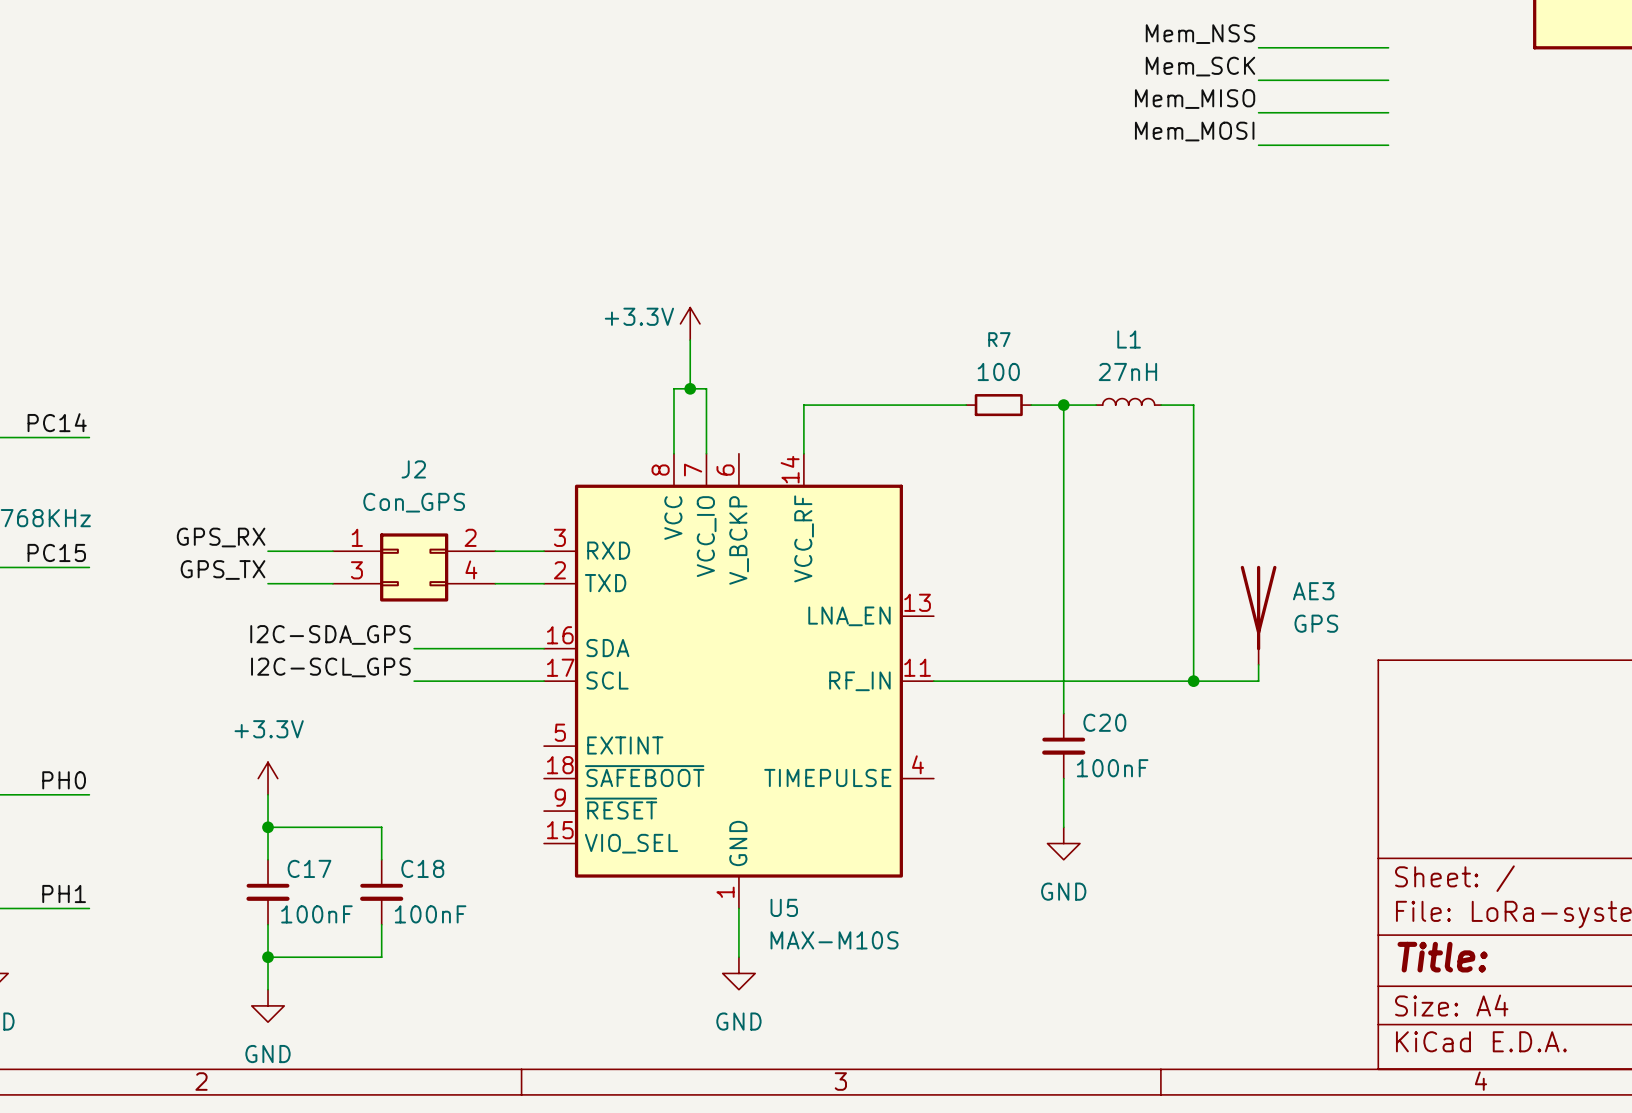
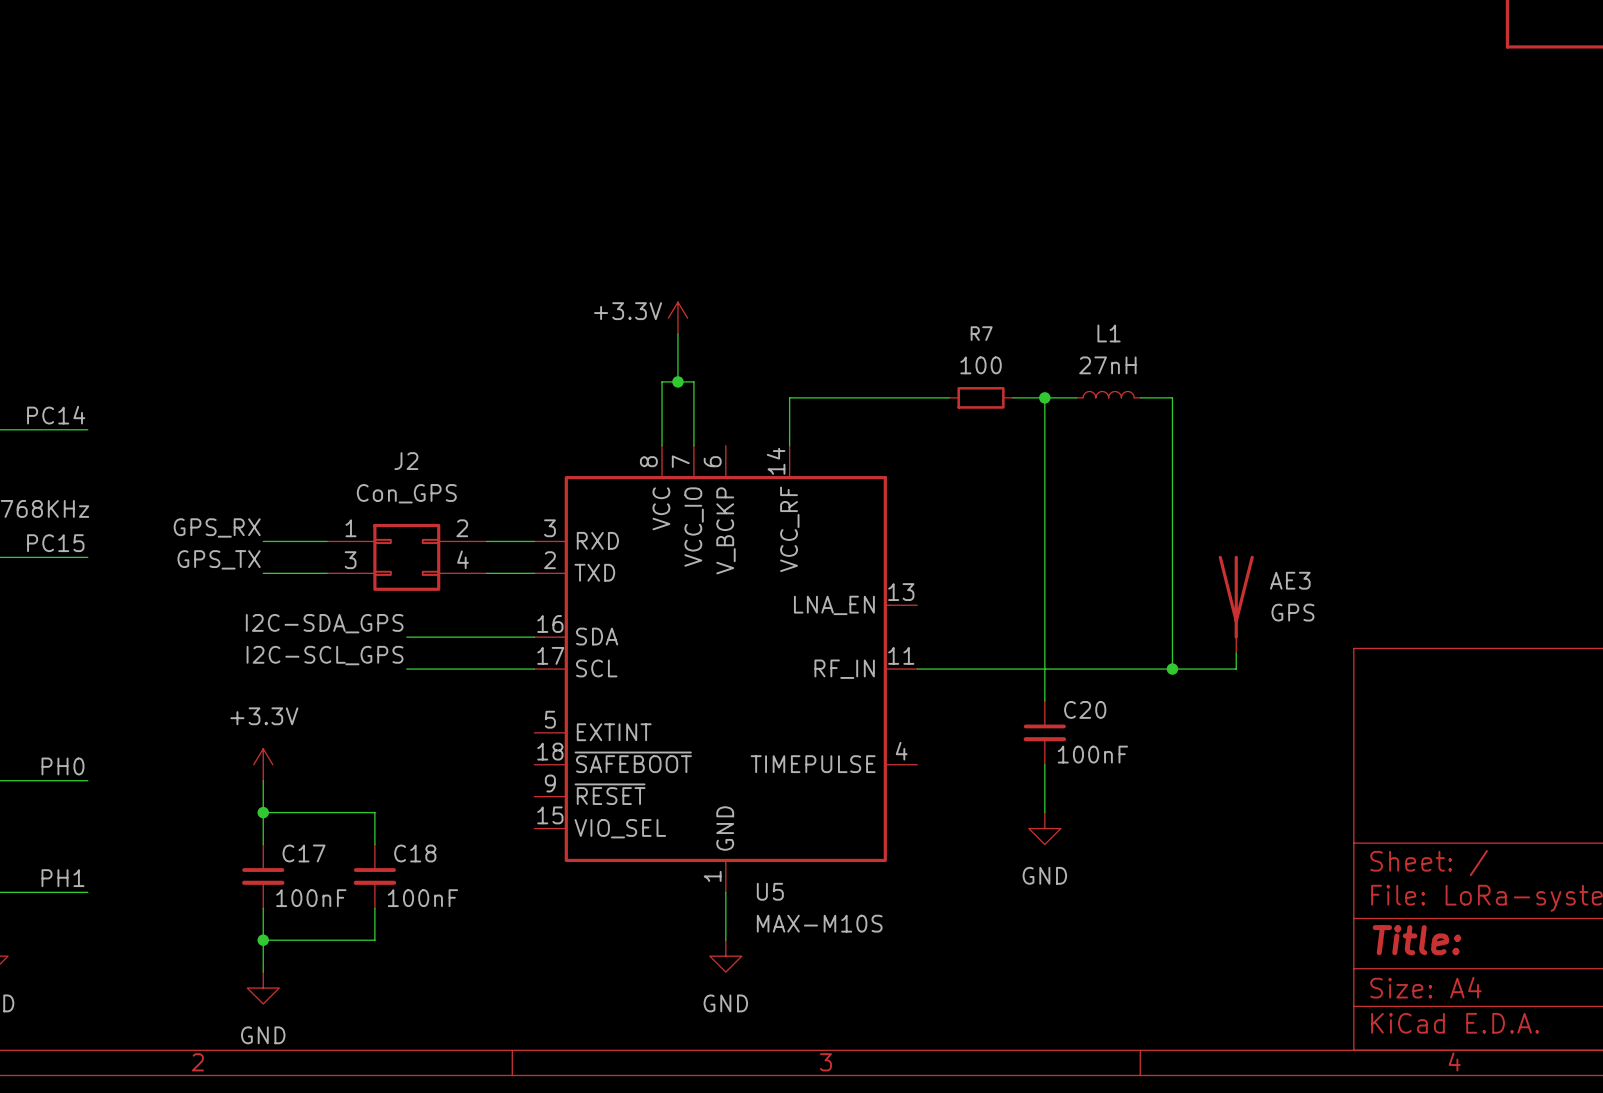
label: Mem_NSS (1200, 34) -> none
wire: (1258, 47) (1388, 47) -> none
label: Mem_SCK (1200, 66) -> none
wire: (1258, 80) (1388, 80) -> none
label: Mem_MISO (1195, 99) -> none
wire: (1258, 112) (1388, 112) -> none
label: Mem_MOSI (1194, 131) -> none
wire: (1258, 145) (1388, 145) -> none

